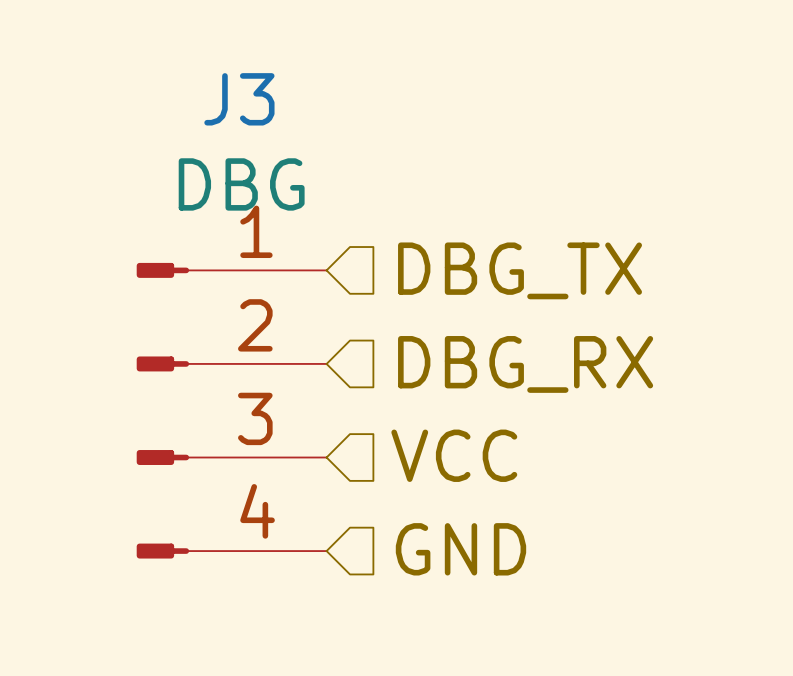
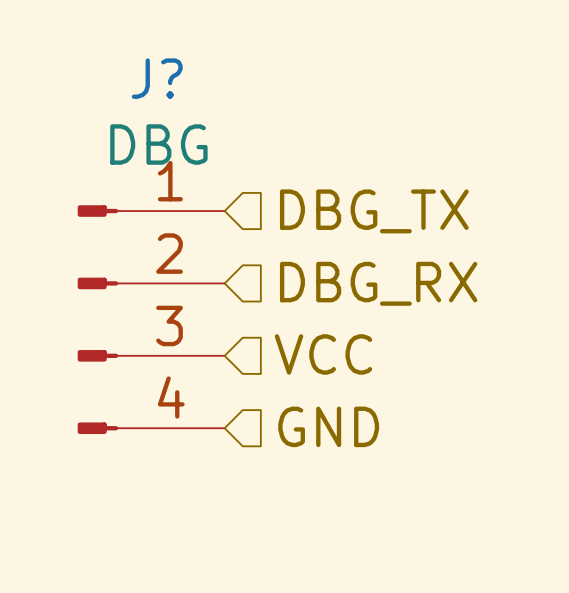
J3 name: J3 (239, 99) -> J? (157, 78)

